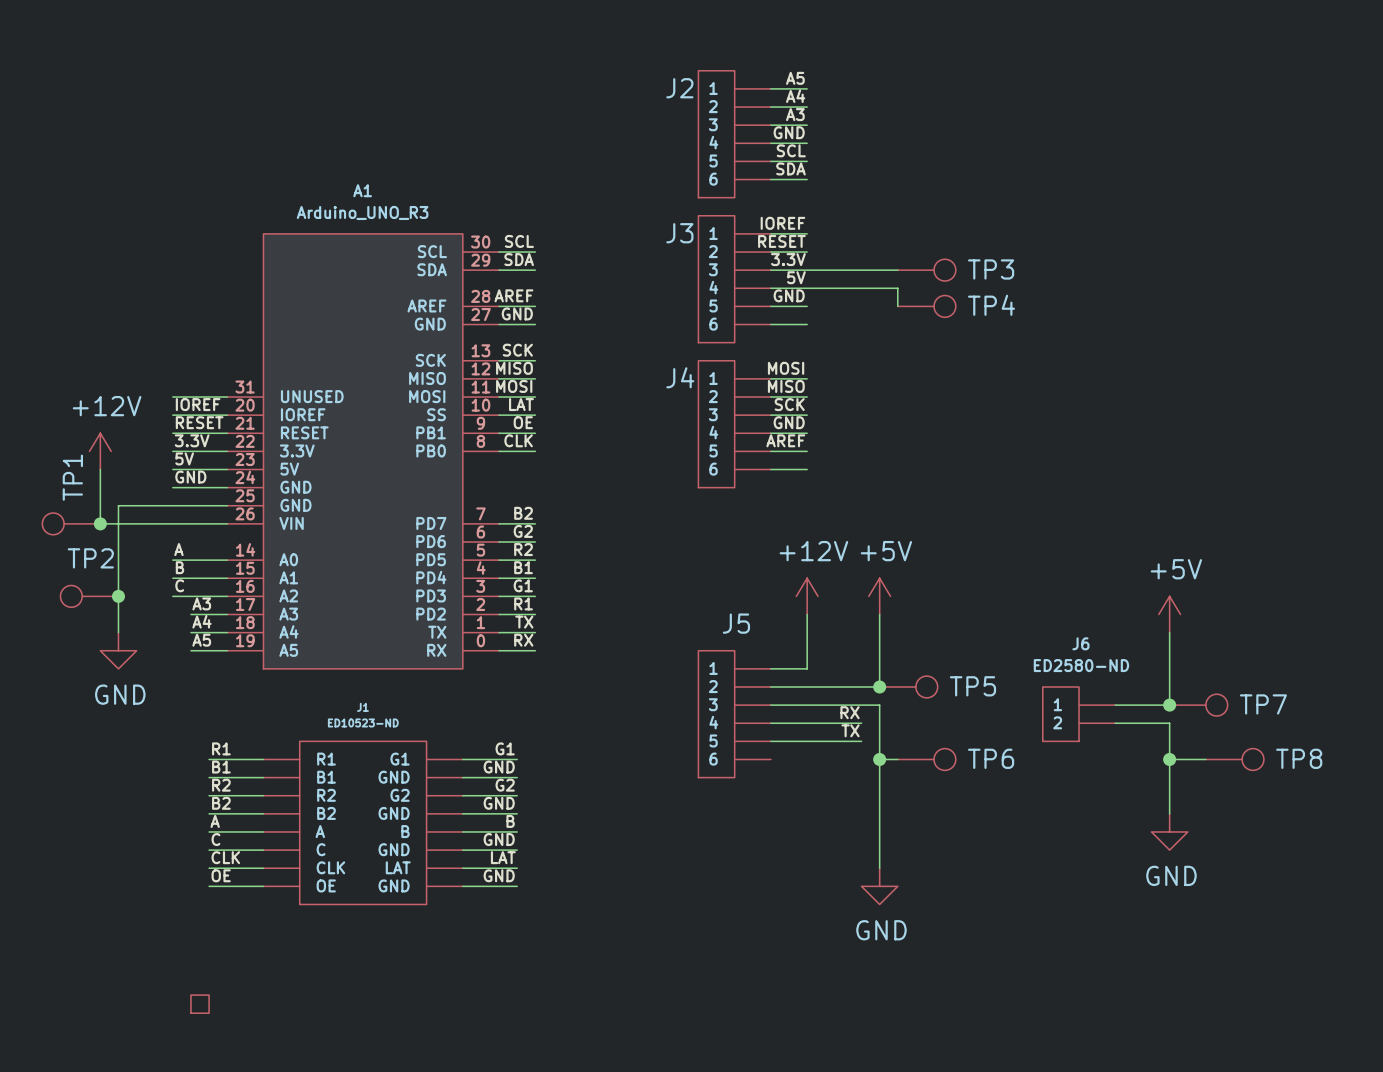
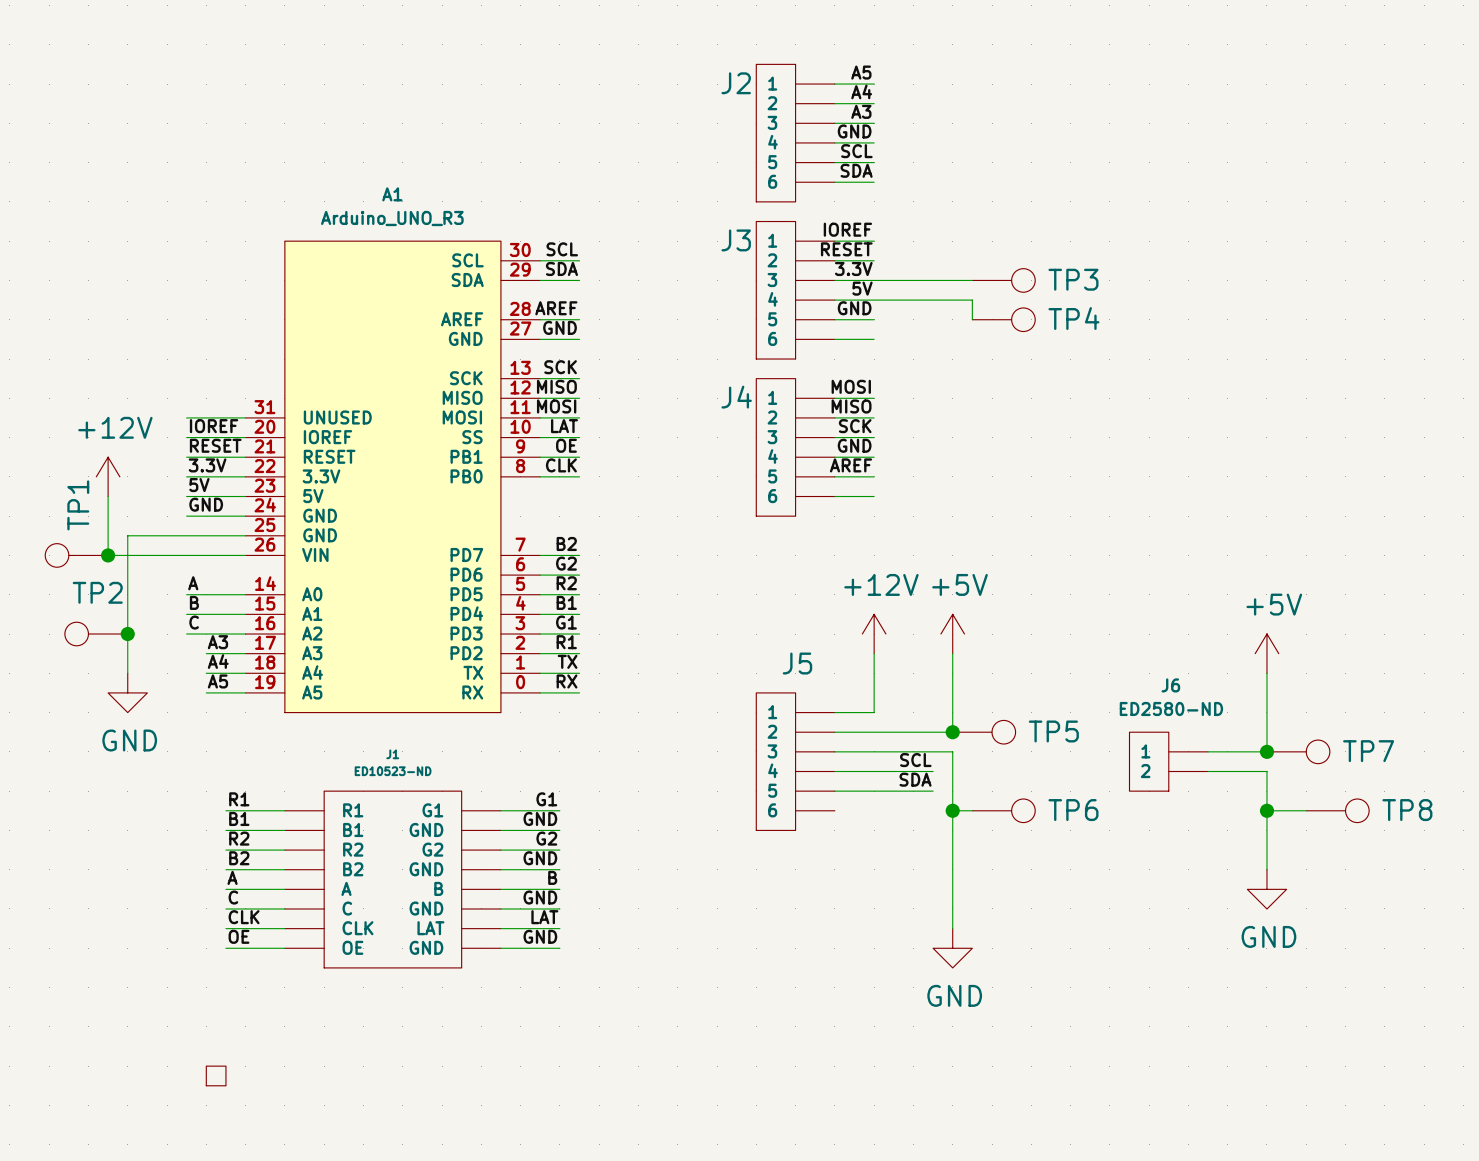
label: RX (850, 712) -> SCL (915, 760)
label: TX (850, 730) -> SDA (915, 779)

